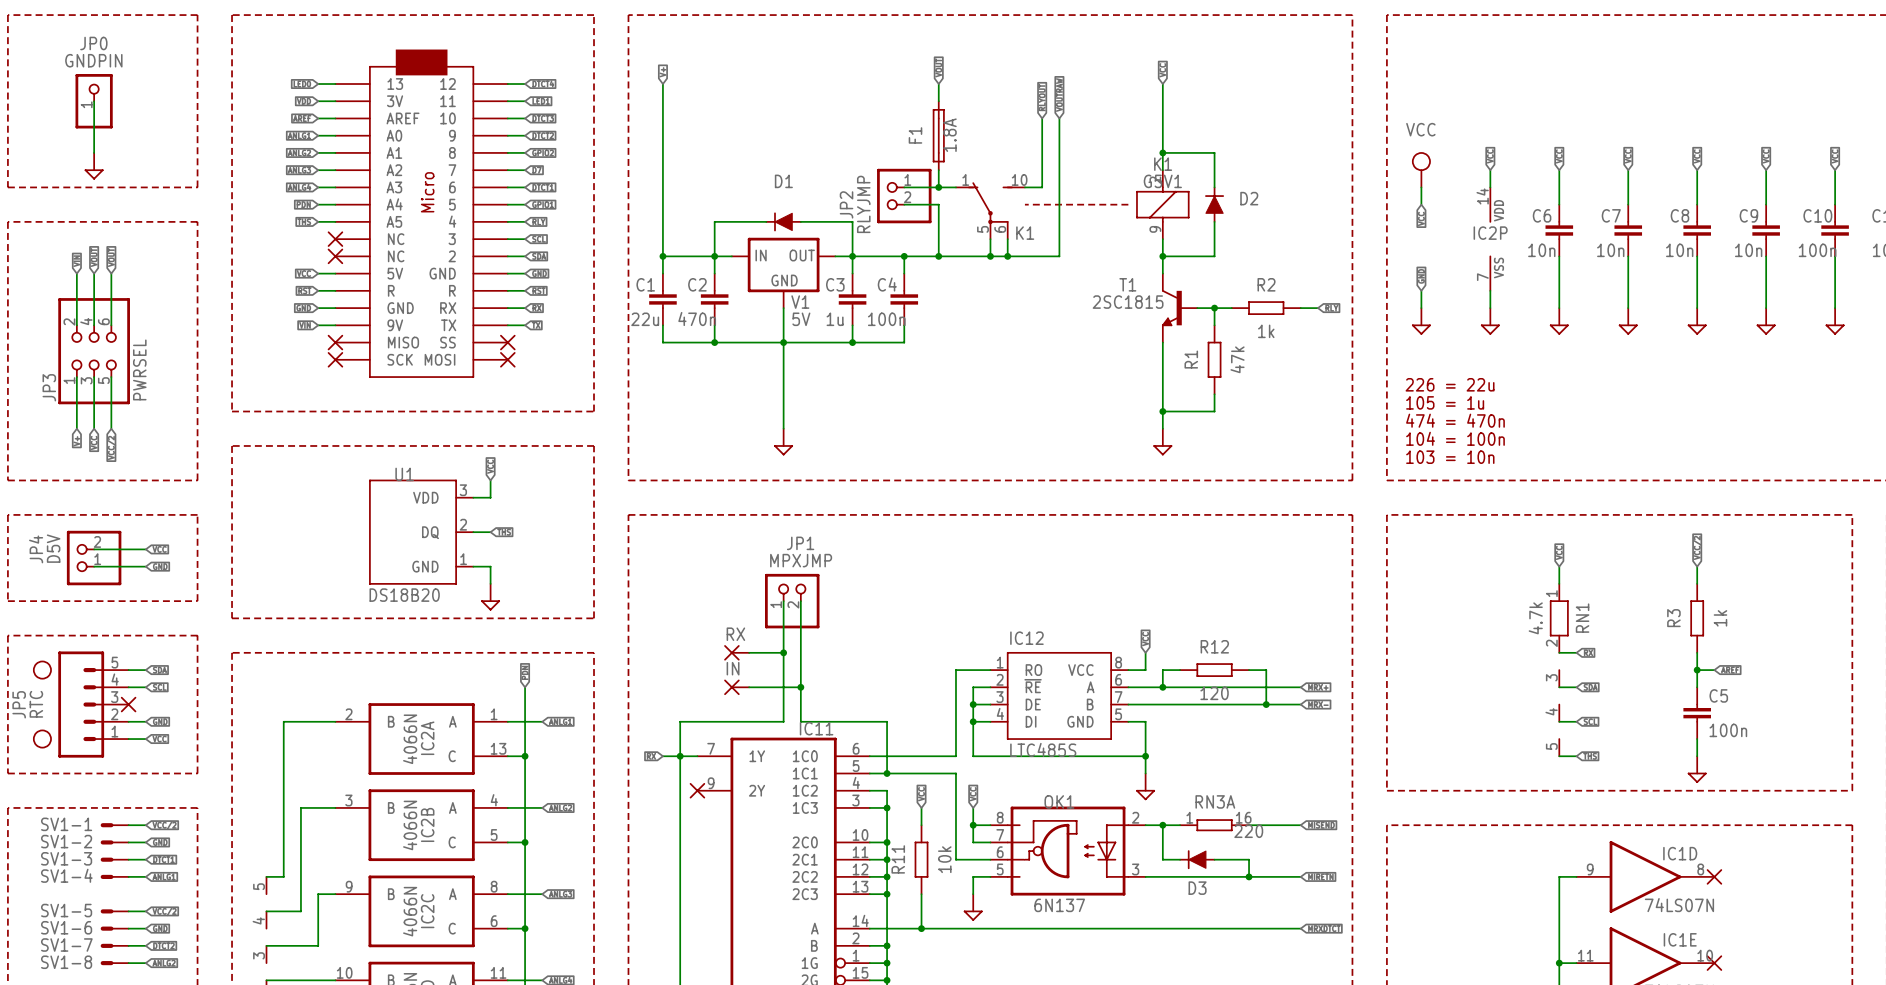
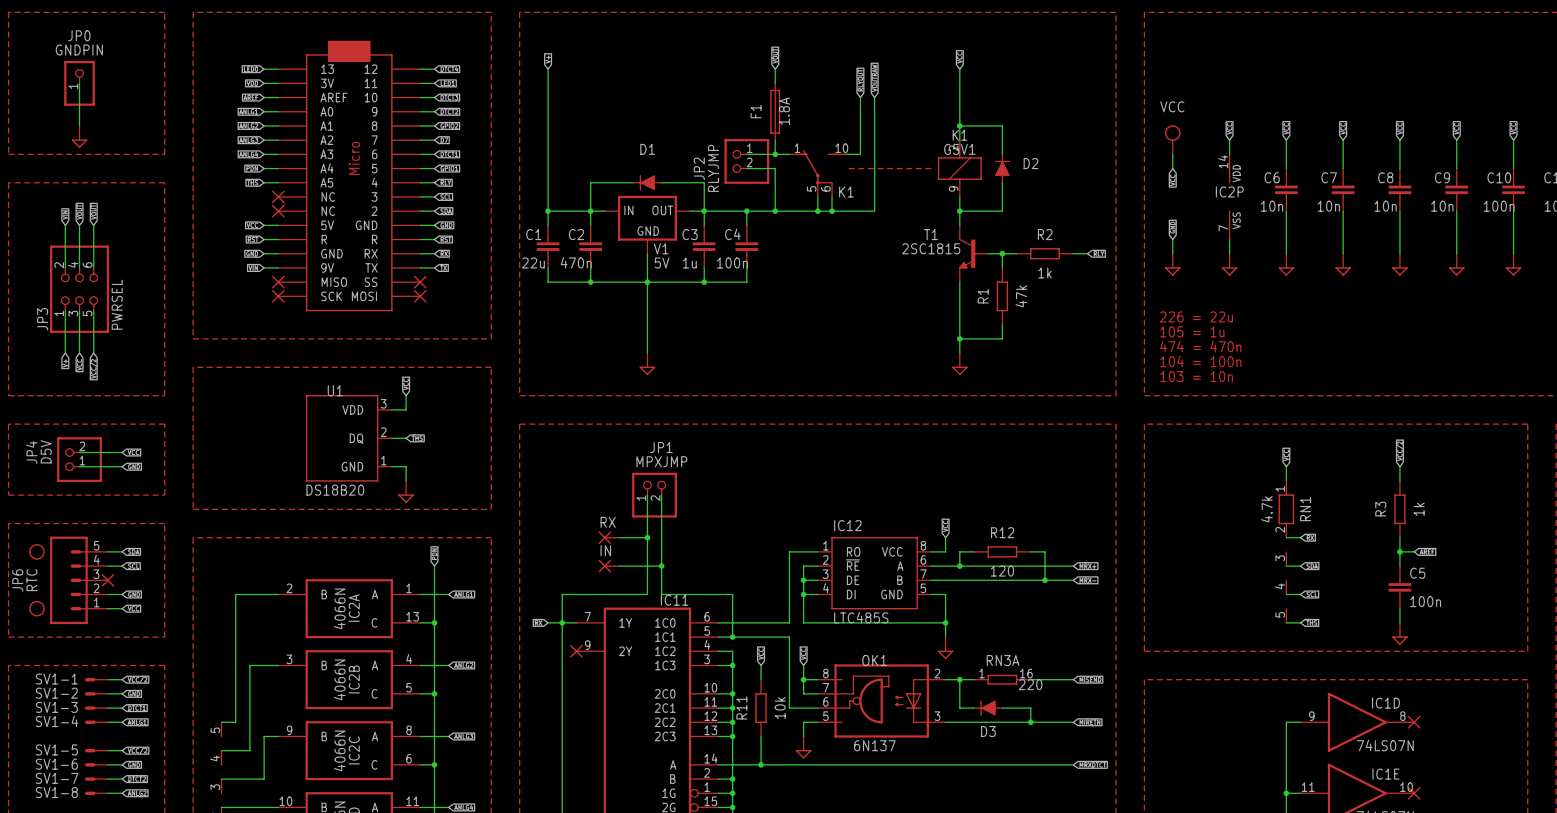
JP5 name: JP5 (19, 704) -> JP6 (17, 580)

